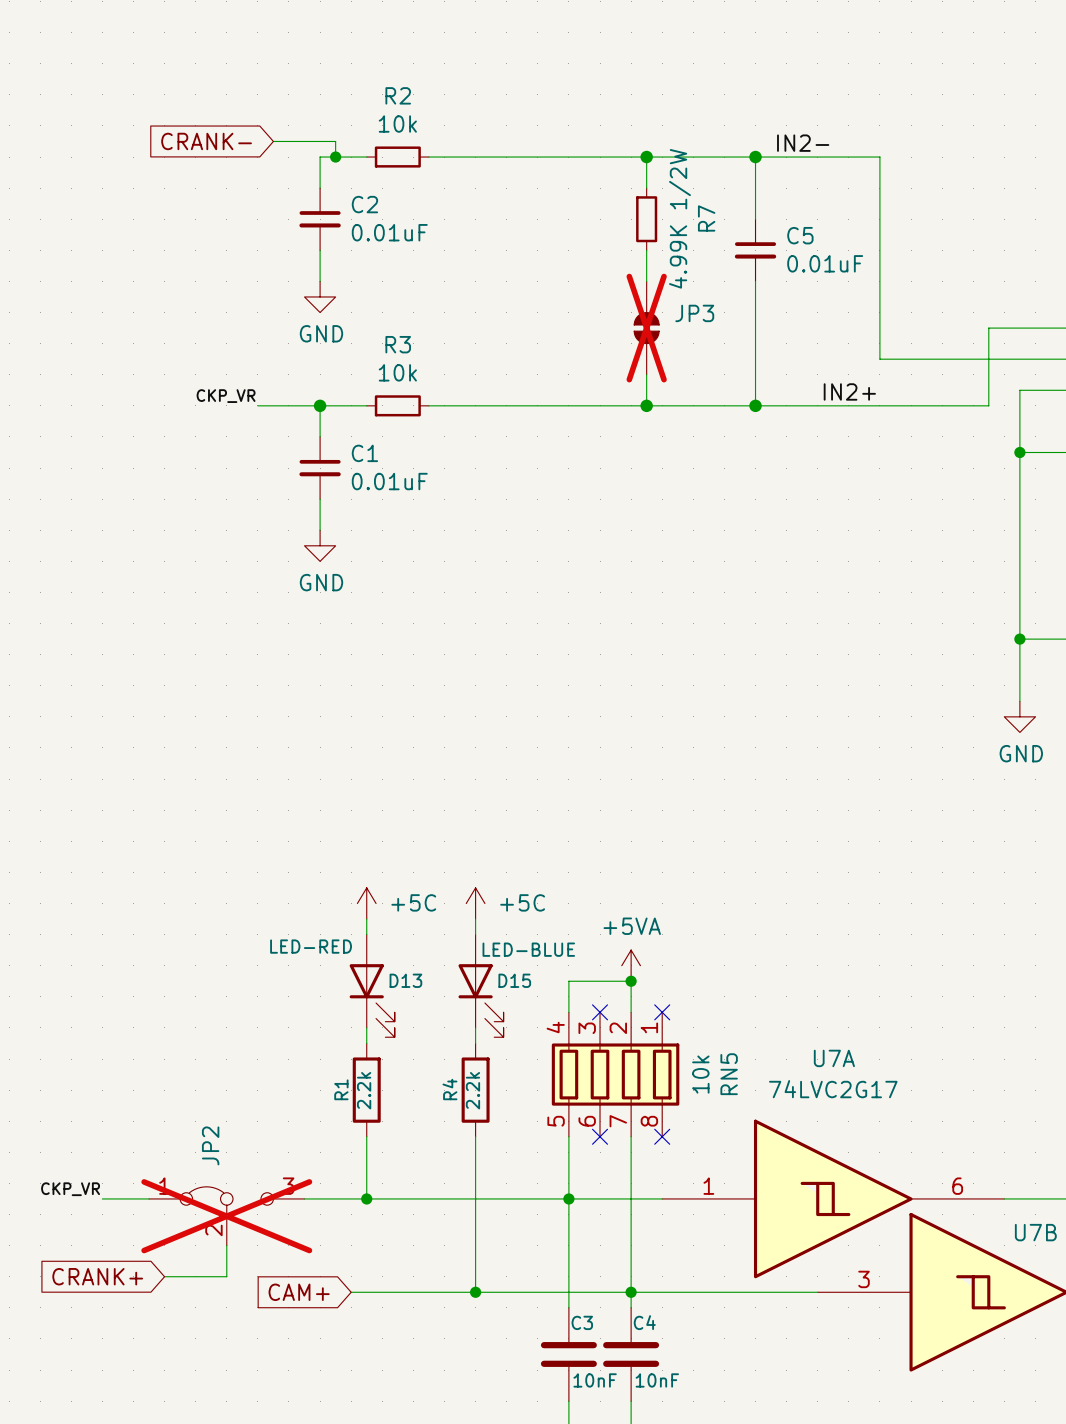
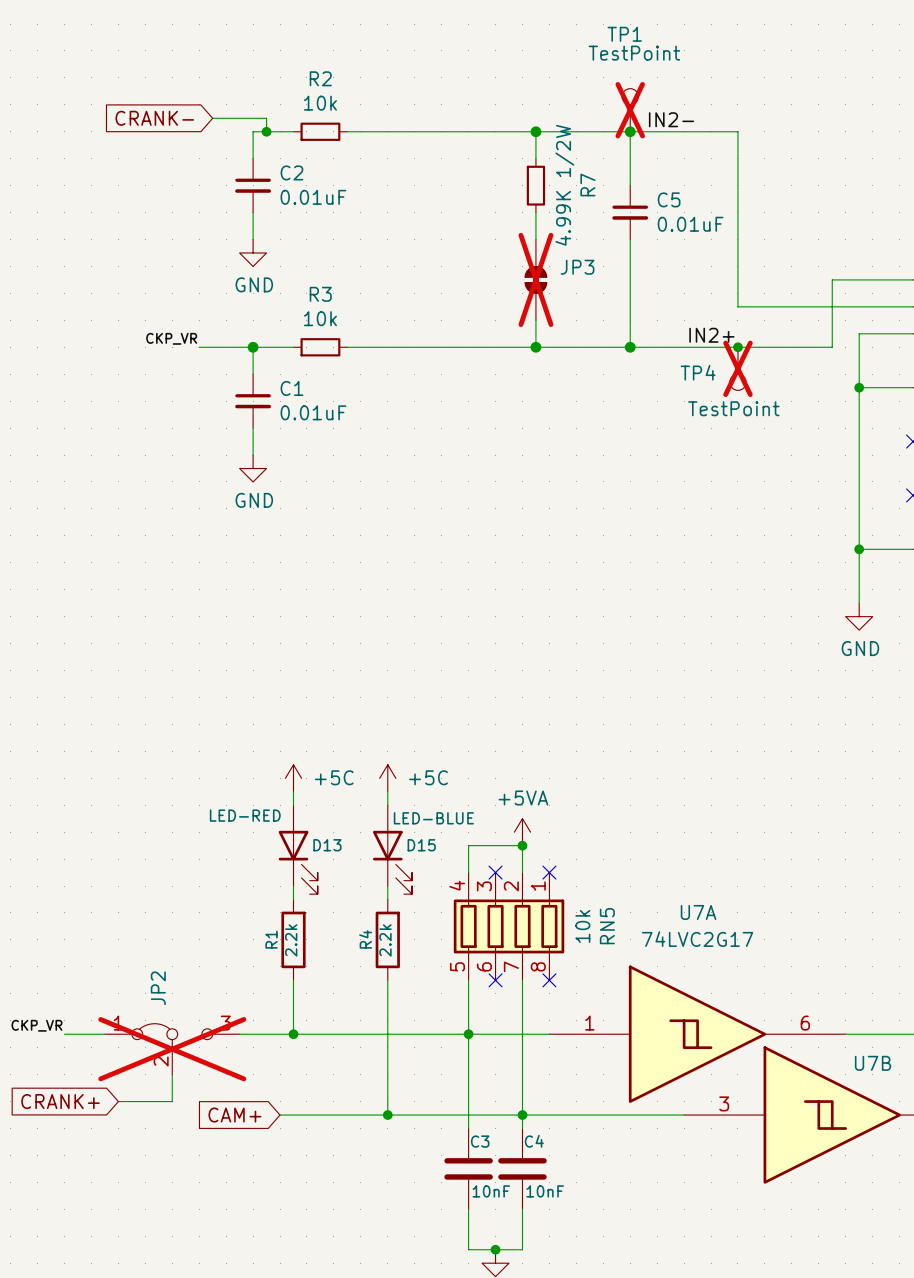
TP1: none -> TestPoint (630, 110)
junction: none -> (737, 347)
TP4: none -> TestPoint (737, 368)

